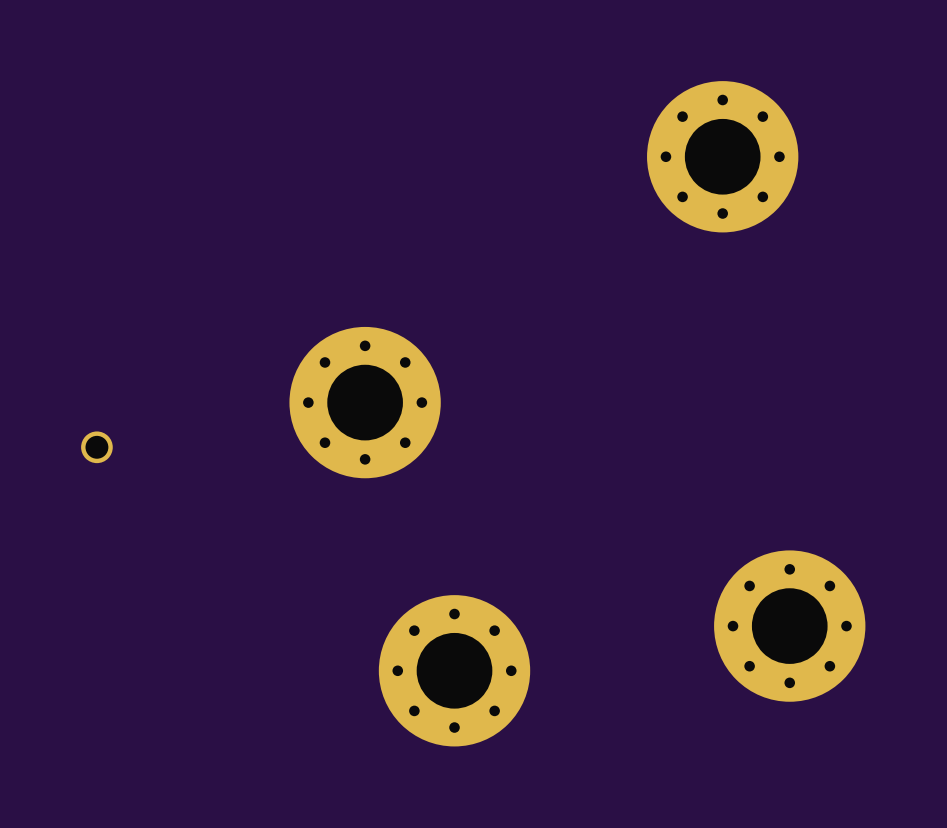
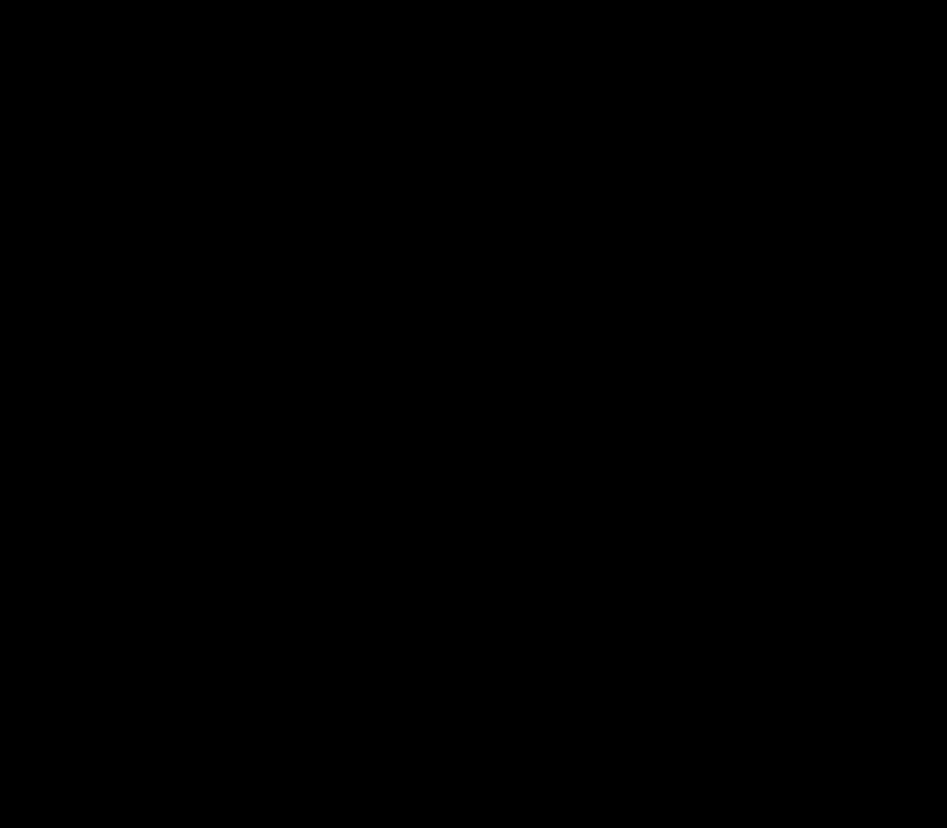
part: (722, 156) -> none
part: (365, 402) -> none
part: (96, 447) -> none
part: (789, 626) -> none
part: (454, 670) -> none

